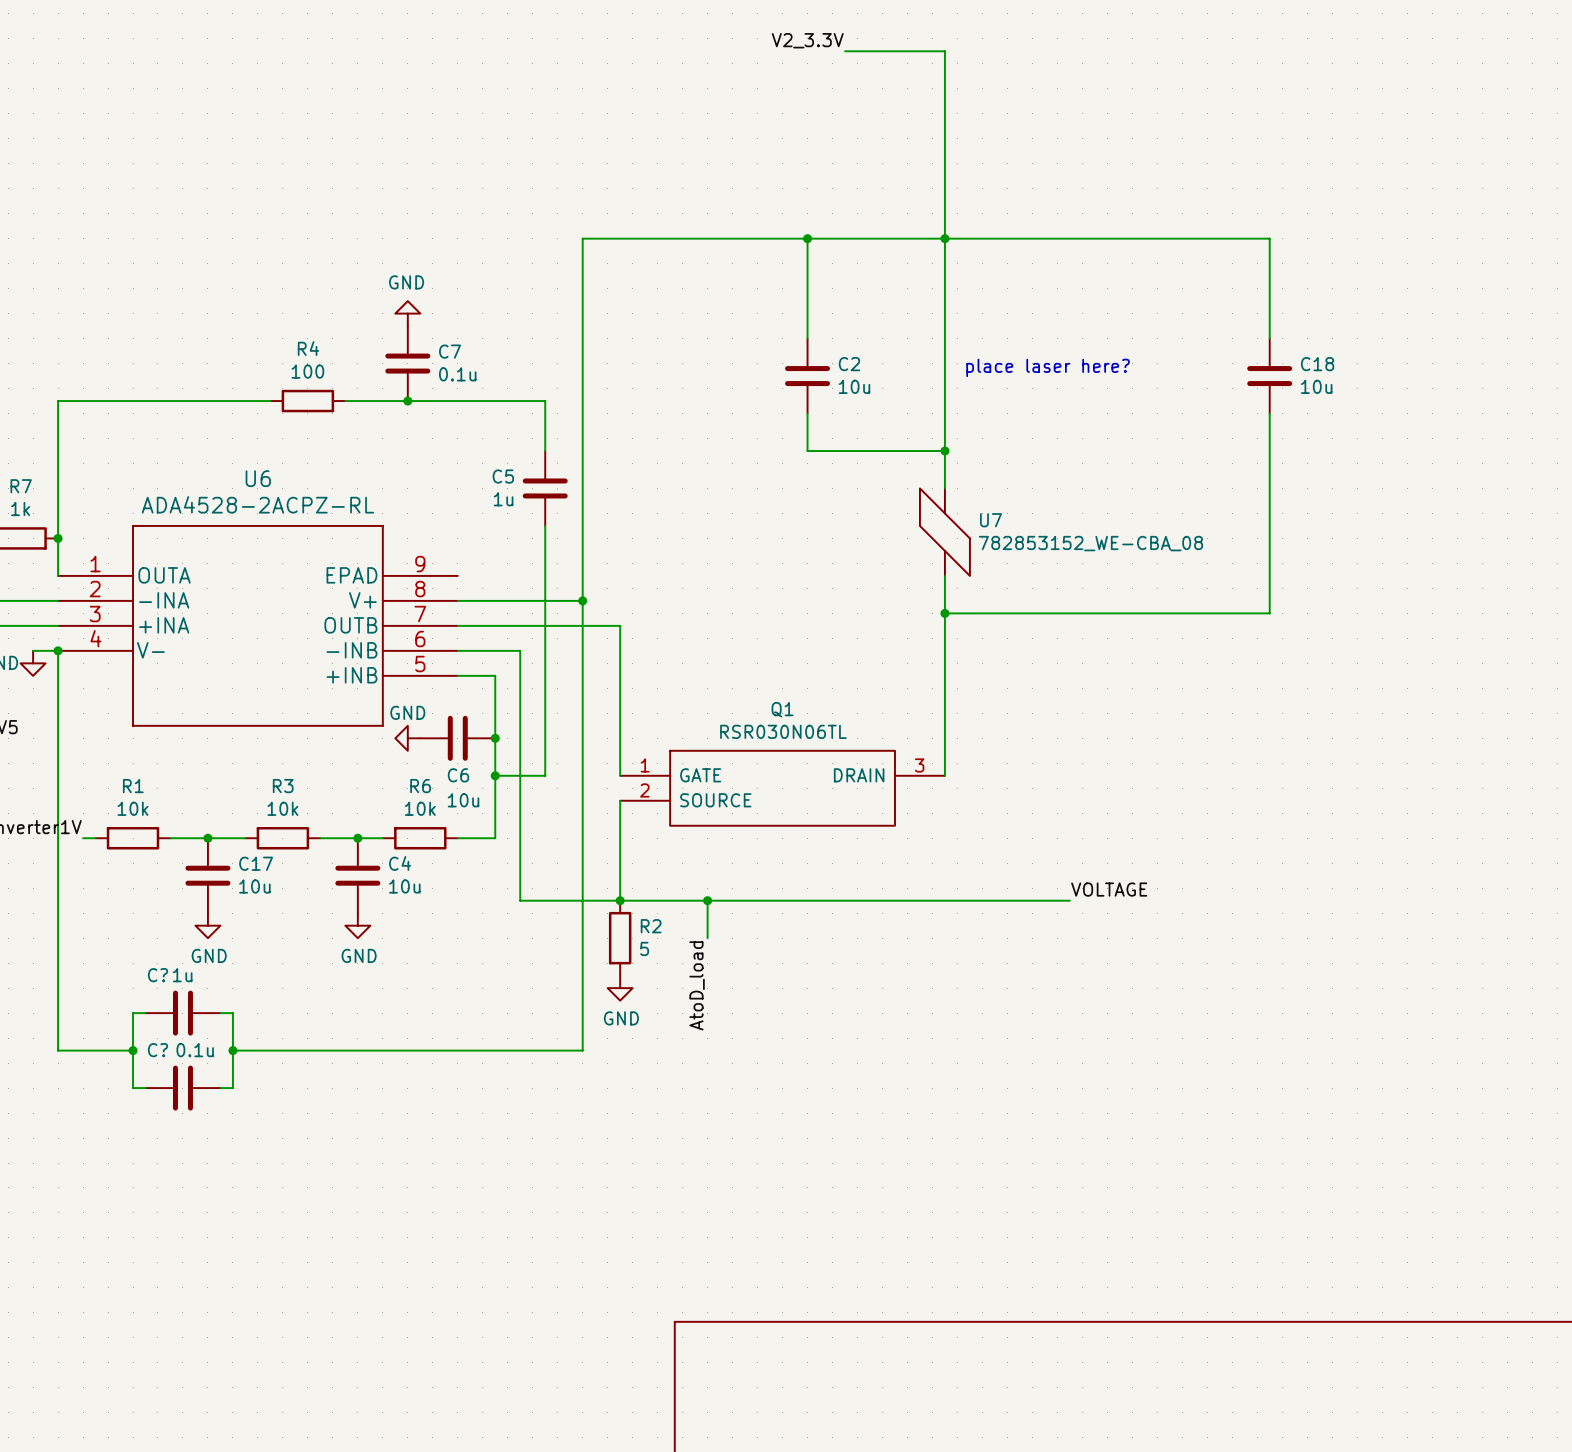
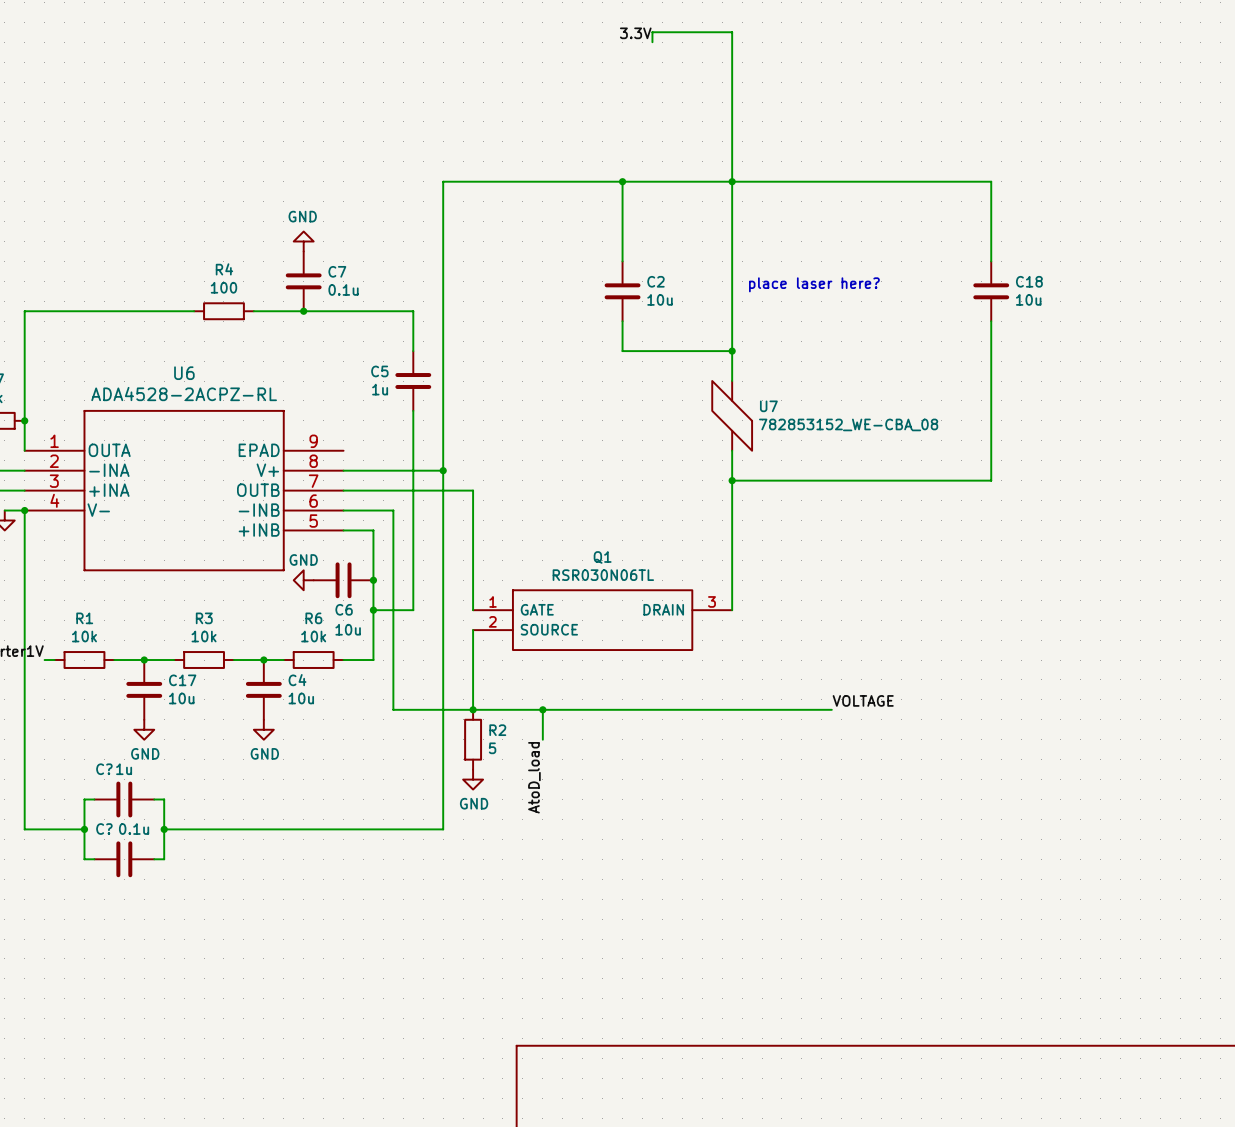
label: V2_3.3V (807, 40) -> 3.3V (635, 33)
wire: none -> (652, 32) (652, 42)

